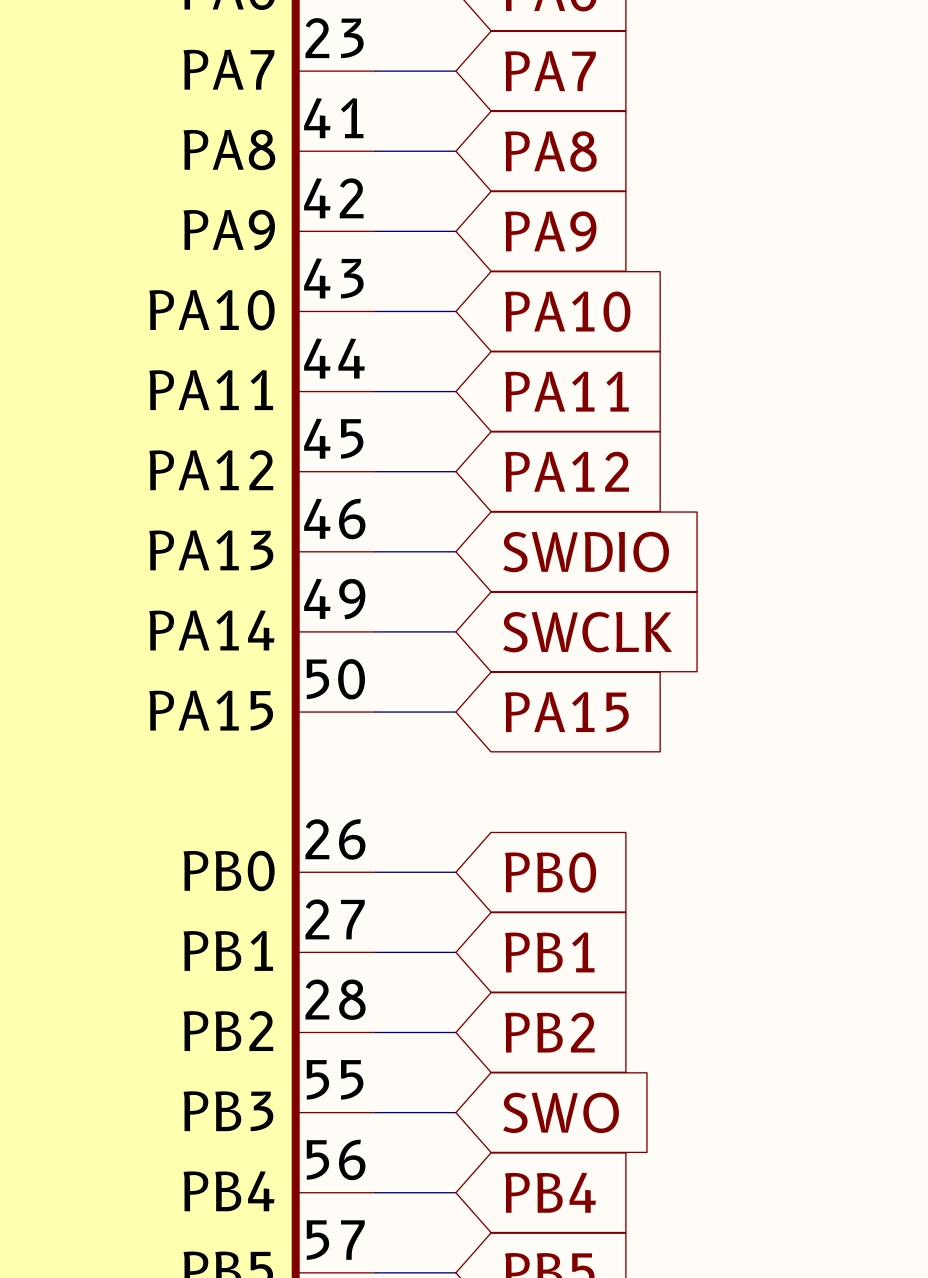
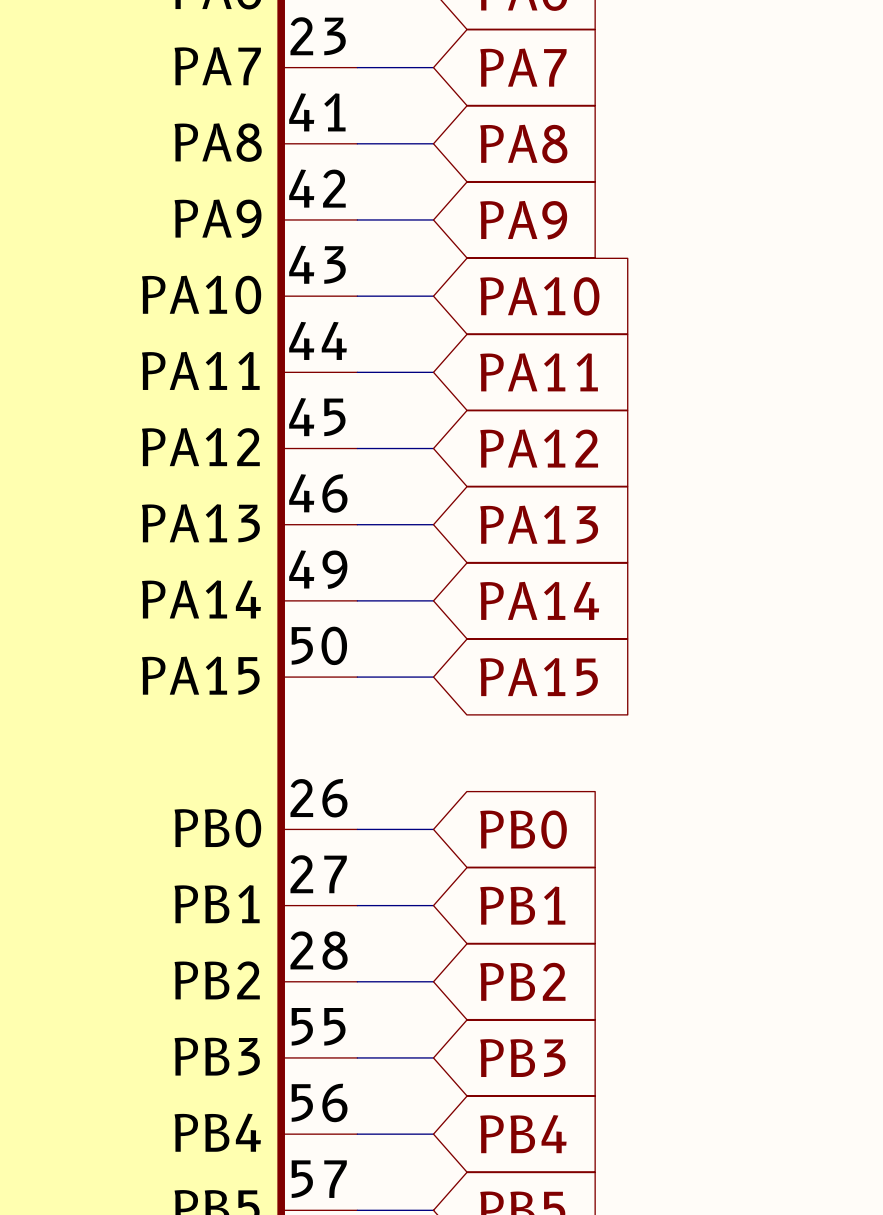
global label: SWDIO (586, 552) -> PA13 (539, 524)
global label: SWCLK (587, 632) -> PA14 (539, 600)
global label: SWO (561, 1112) -> PB3 (522, 1058)

